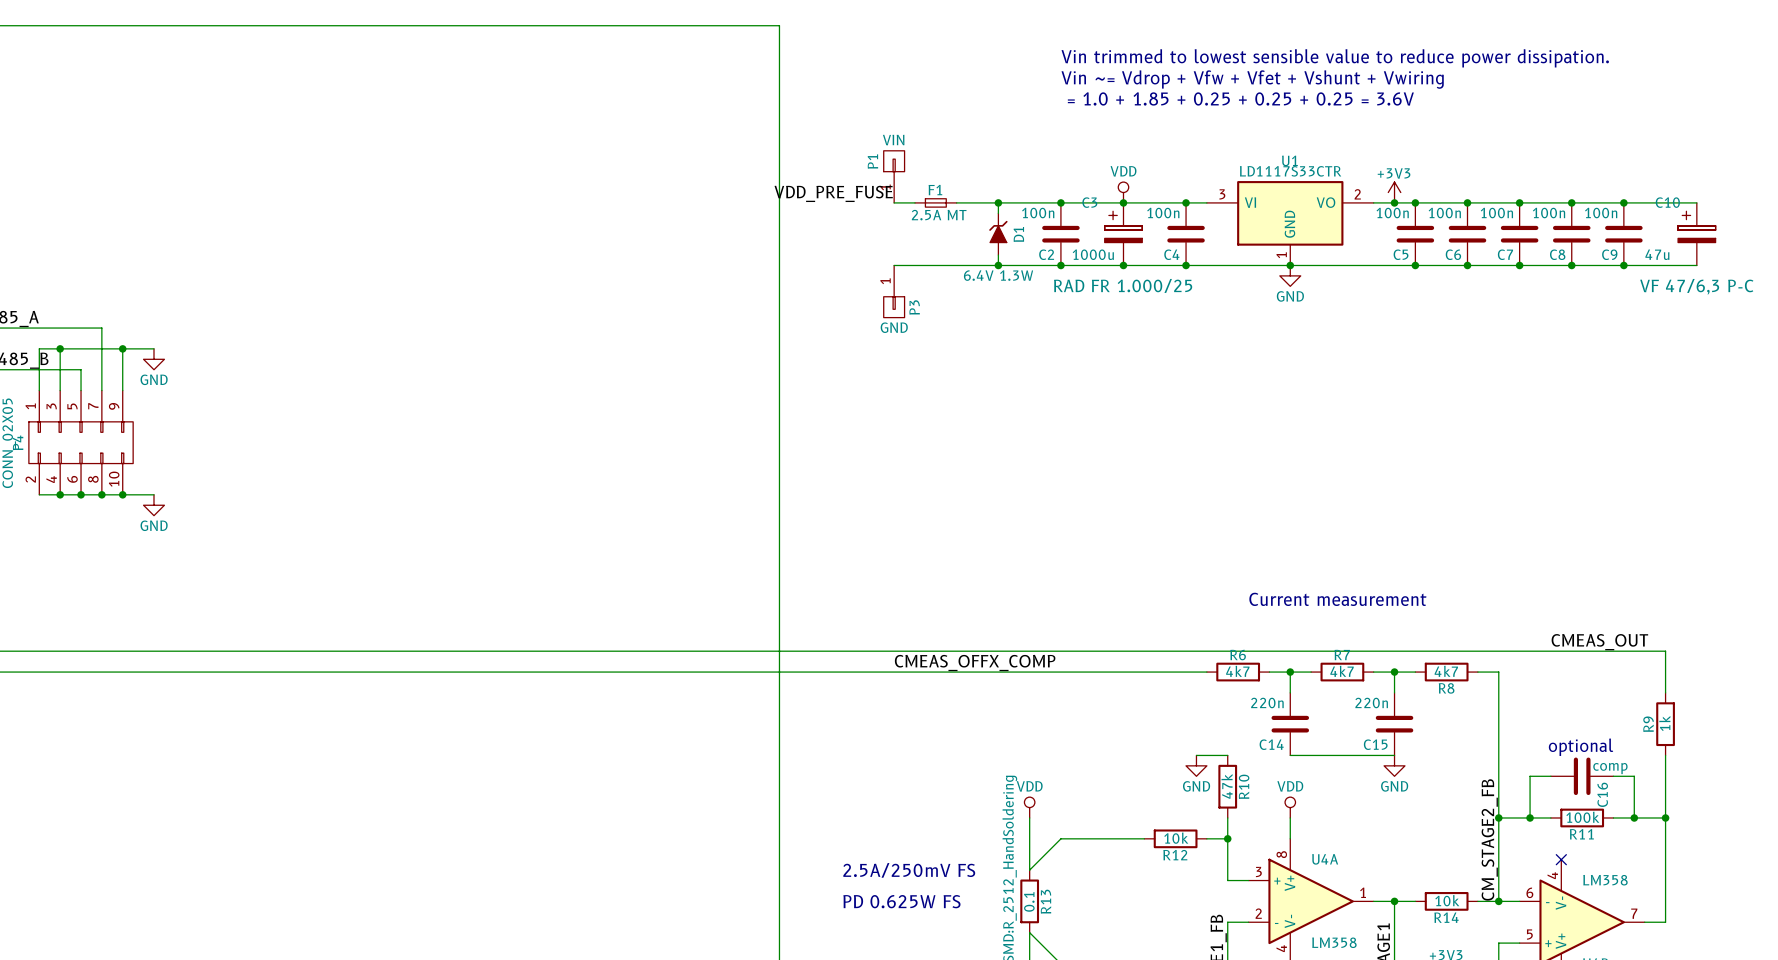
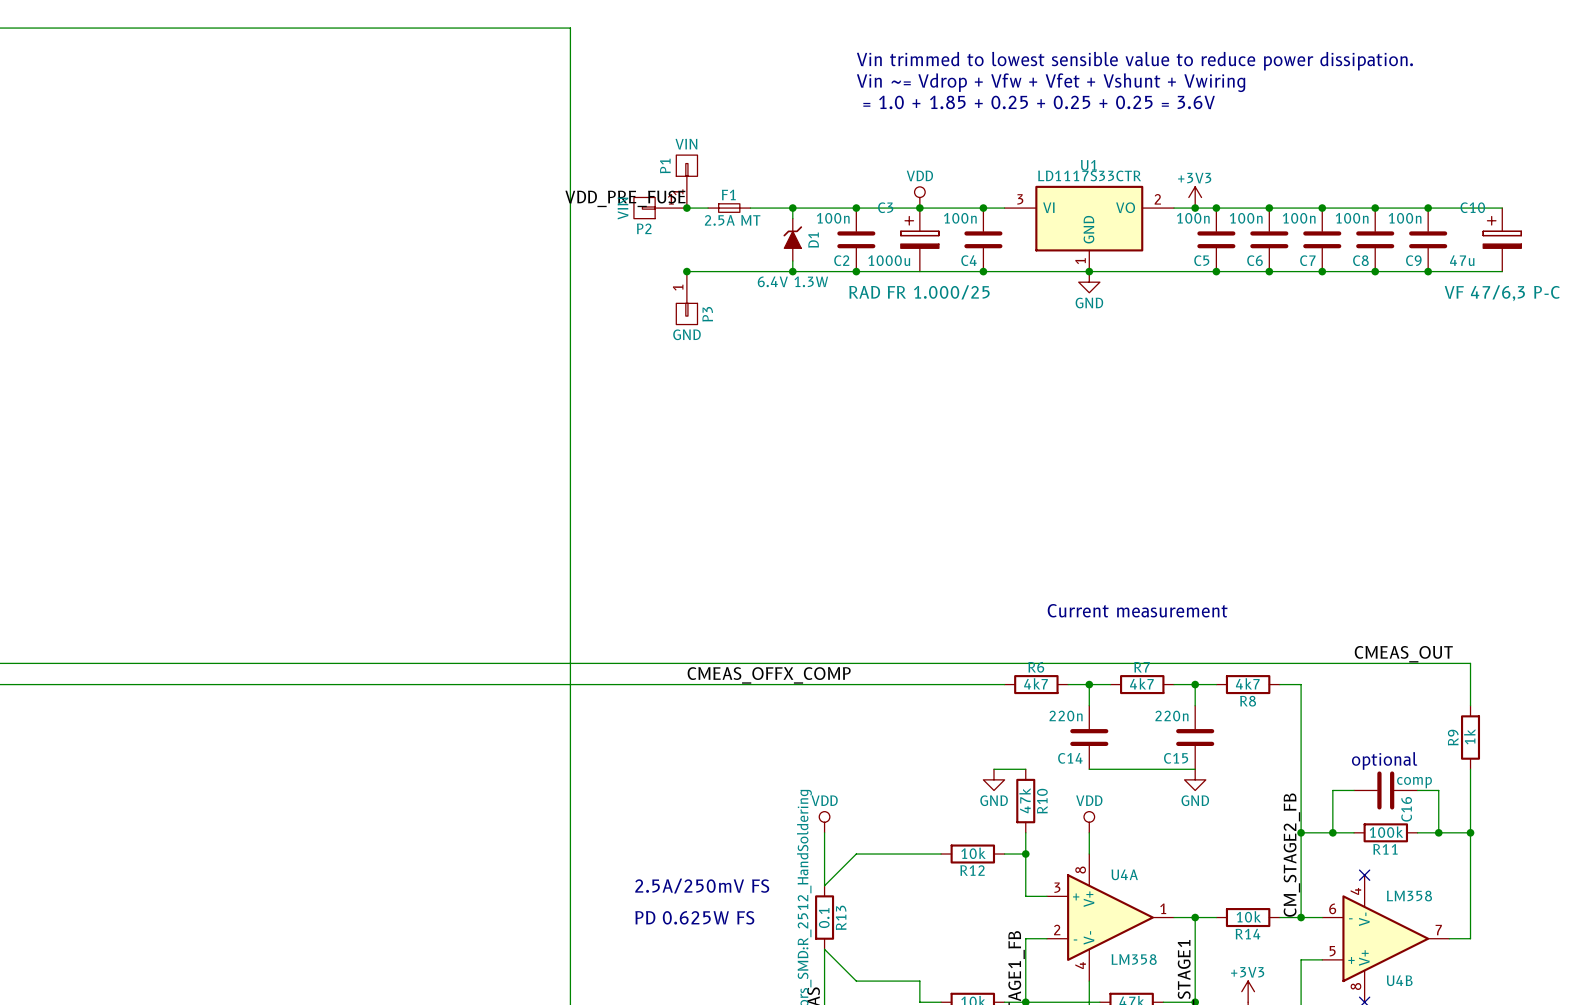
P2: none -> VIN (660, 208)
junction: none -> (686, 208)
junction: none -> (686, 271)
junction: (1123, 265) -> none

